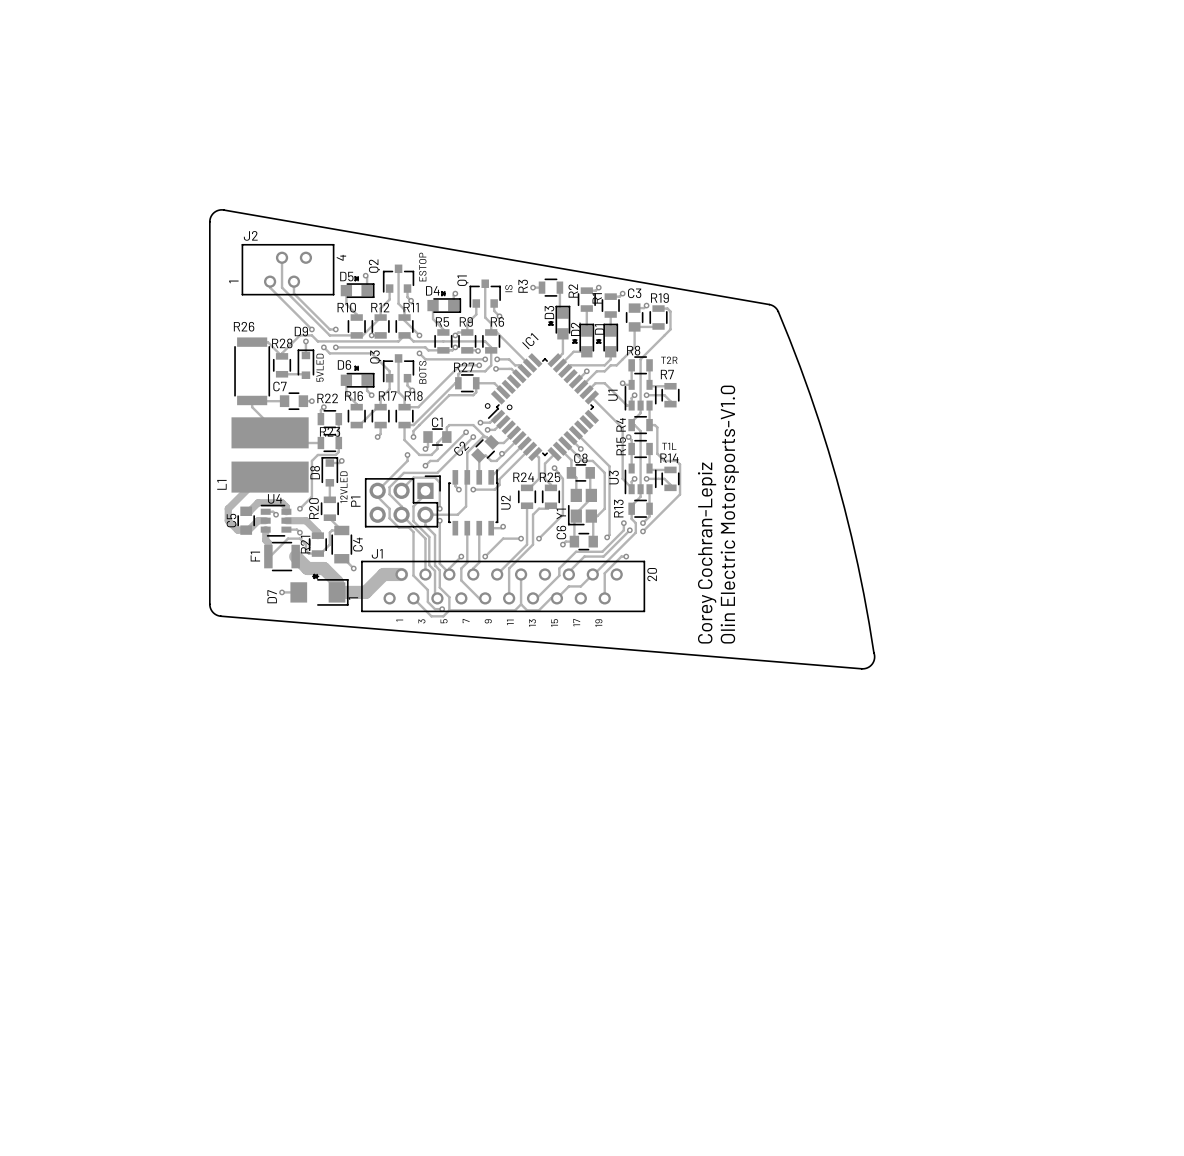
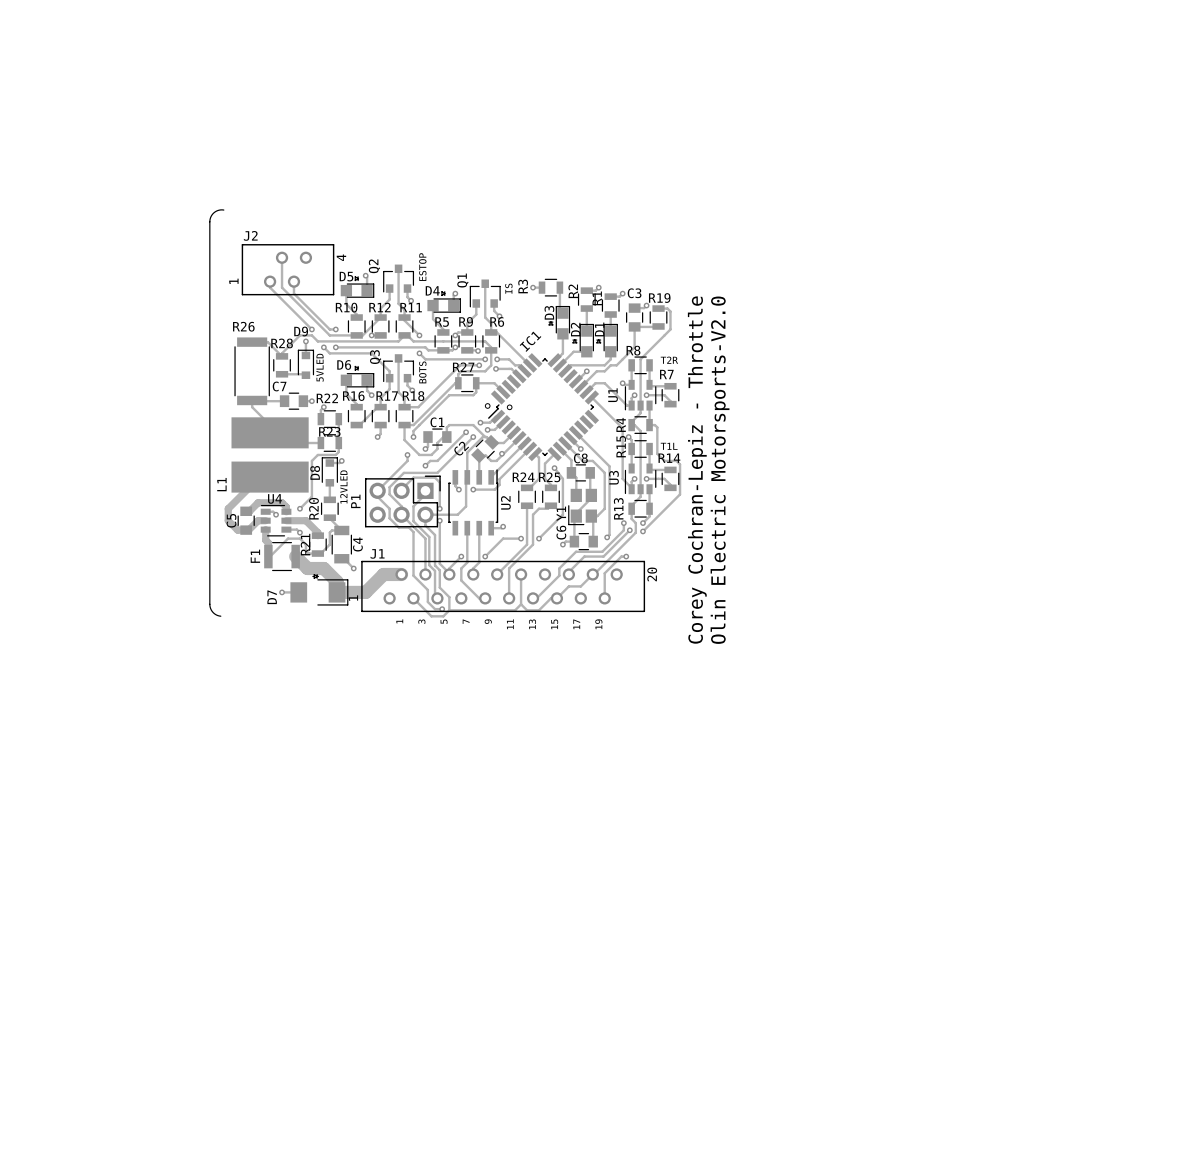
board edge: (223, 210) (773, 306) (778, 311) (800, 366) (836, 479) (858, 565) (874, 657) (871, 665) (861, 668) (220, 616) -> none
text: Olin Electric Motorsports-V1.0 (729, 514) -> Olin Electric Motorsports-V2.0 (720, 470)
text: Corey Cochran-Lepiz (707, 553) -> Corey Cochran-Lepiz - Throttle (697, 470)

